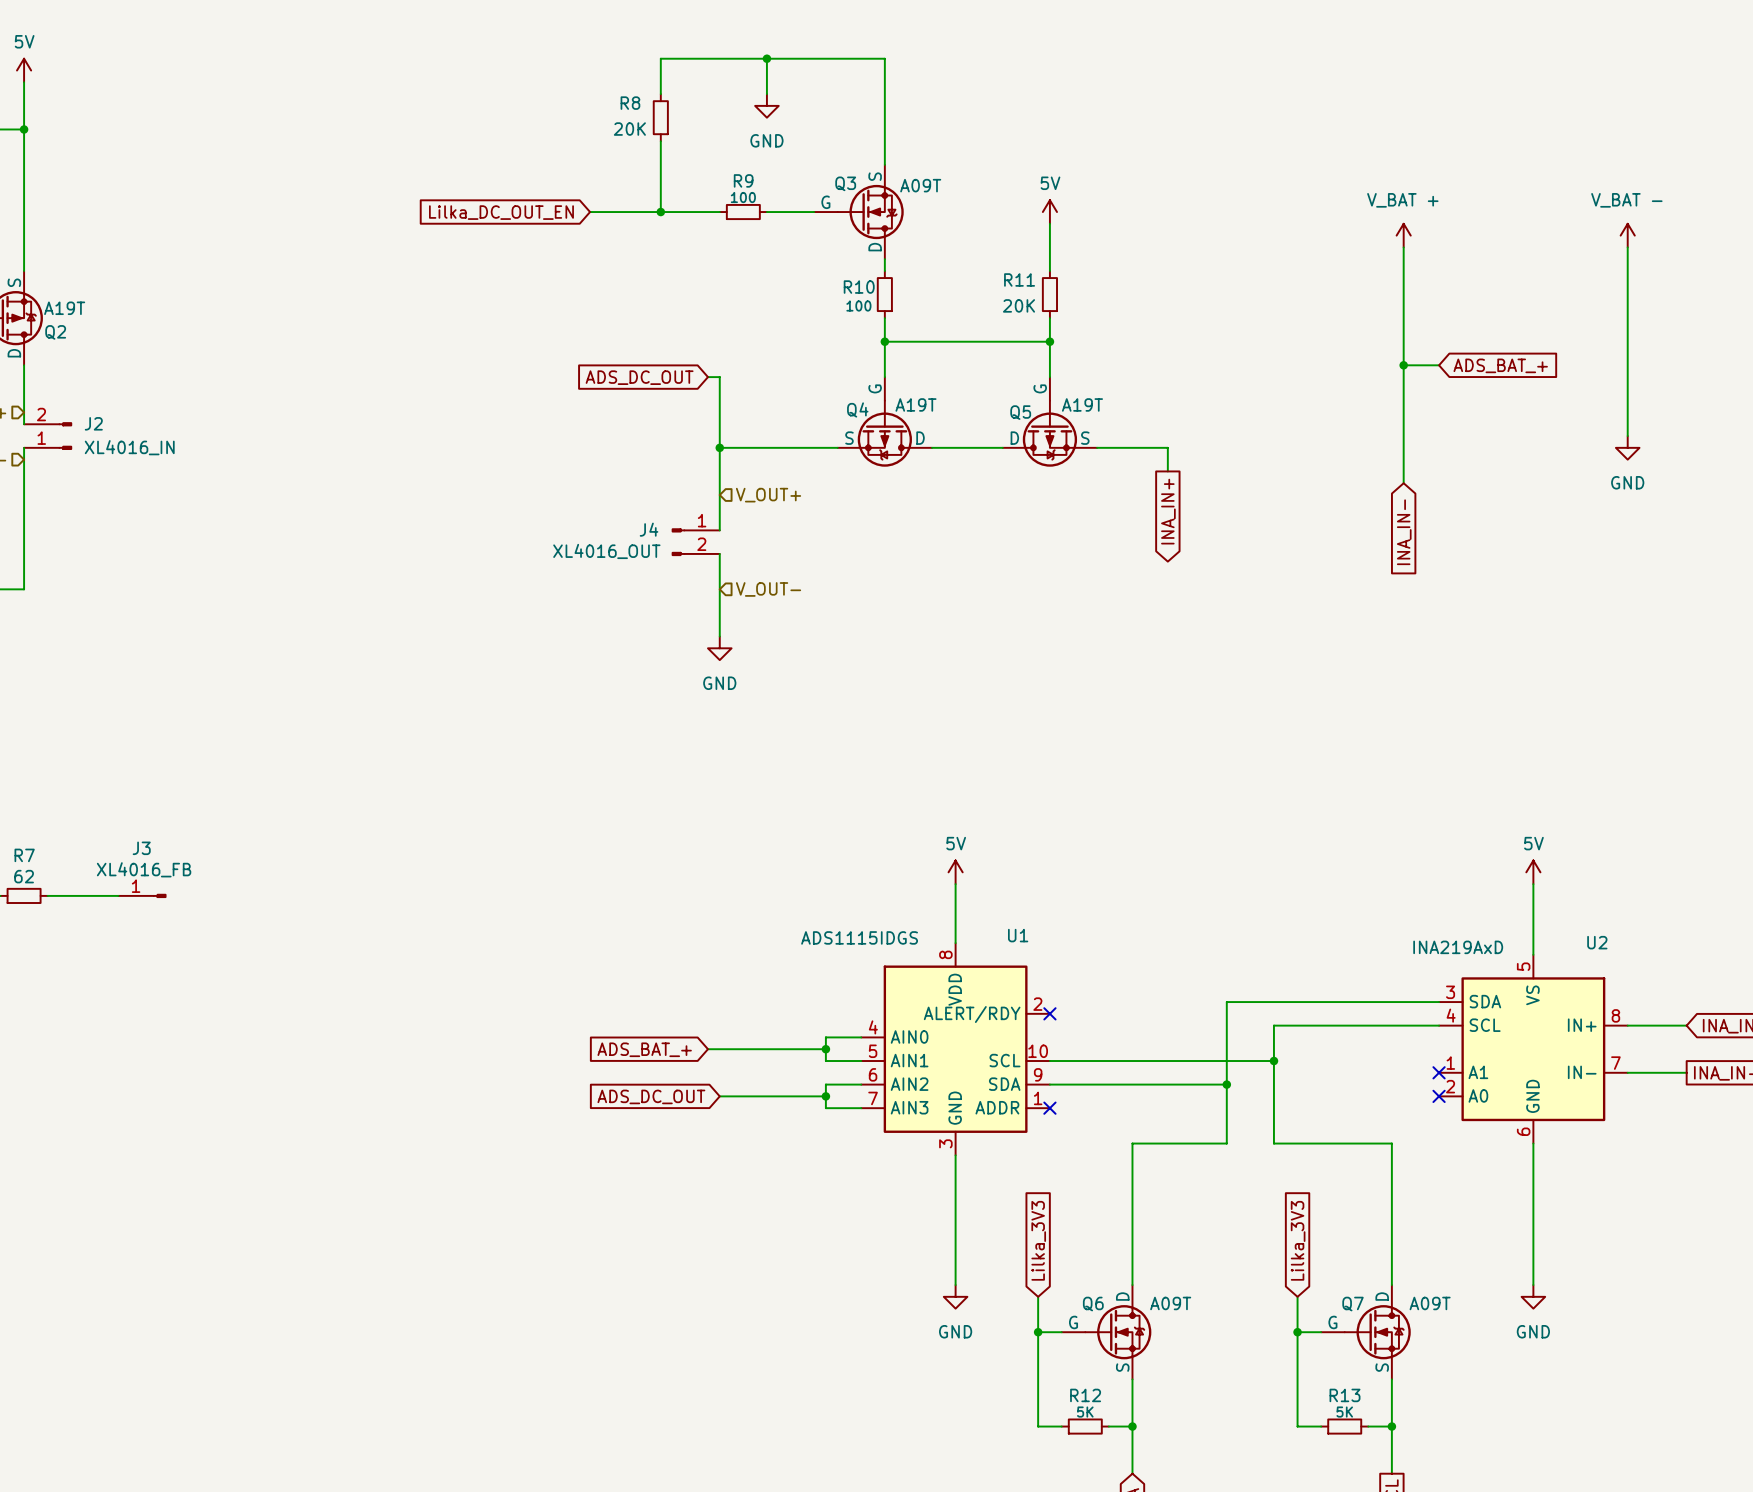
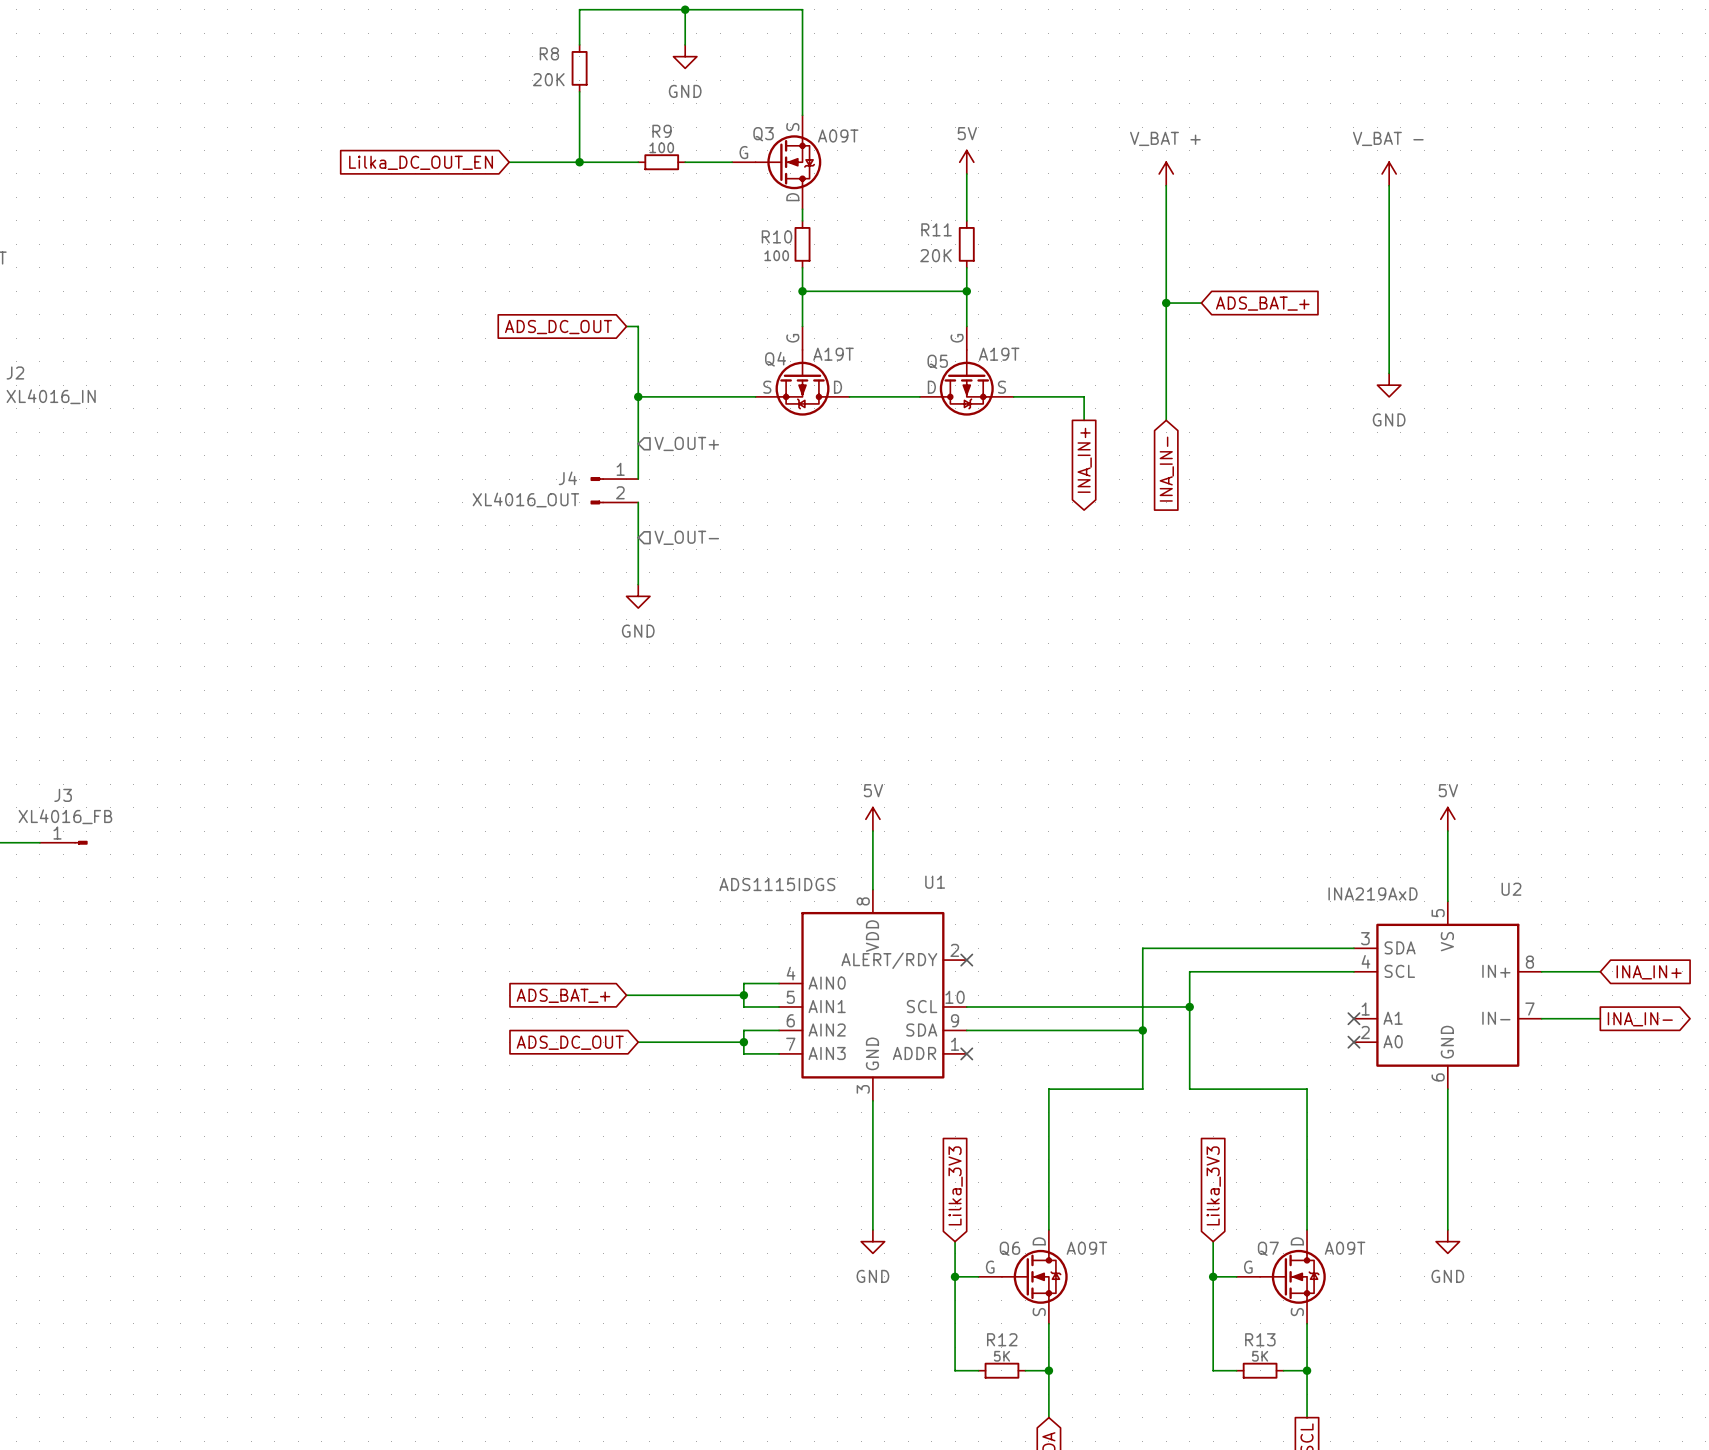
power symbol position: V_BAT + (1403, 235) -> V_BAT + (1166, 173)
power symbol position: V_BAT - (1627, 235) -> V_BAT - (1389, 173)
wire: (1403, 247) (1403, 483) -> (1166, 185) (1166, 420)
wire: (1627, 247) (1627, 436) -> (1389, 185) (1389, 373)
junction: none -> (1166, 303)
wire: (1403, 365) (1439, 365) -> (1166, 303) (1201, 303)
junction: (1403, 365) -> none
global label position: ADS_BAT_+ (1500, 365) -> ADS_BAT_+ (1262, 303)
power symbol position: GND (1627, 447) -> GND (1389, 385)
global label position: INA_IN- (1404, 532) -> INA_IN- (1166, 469)

